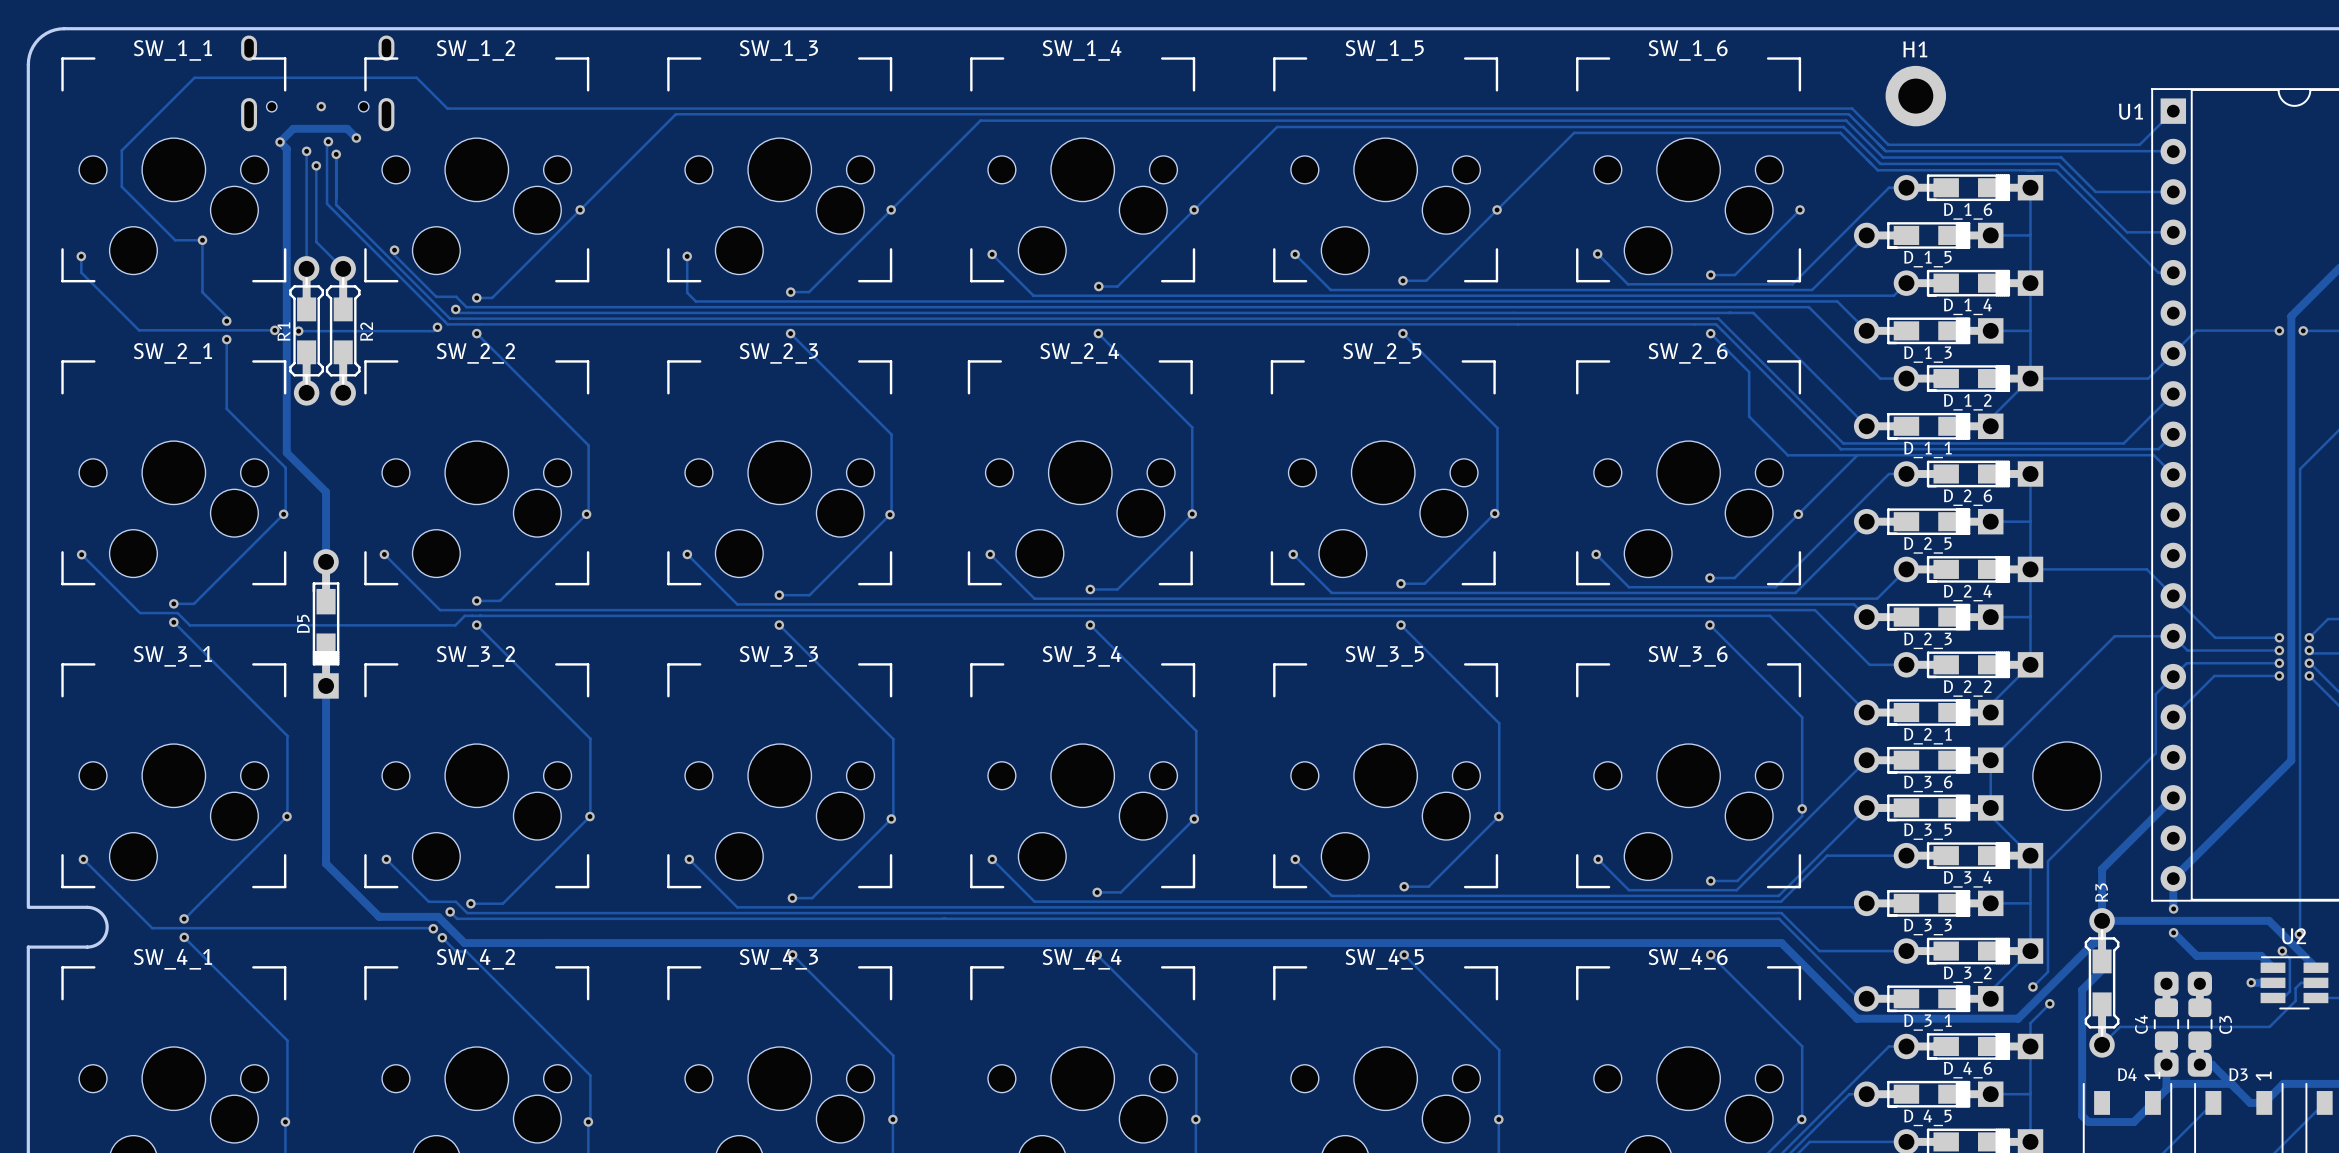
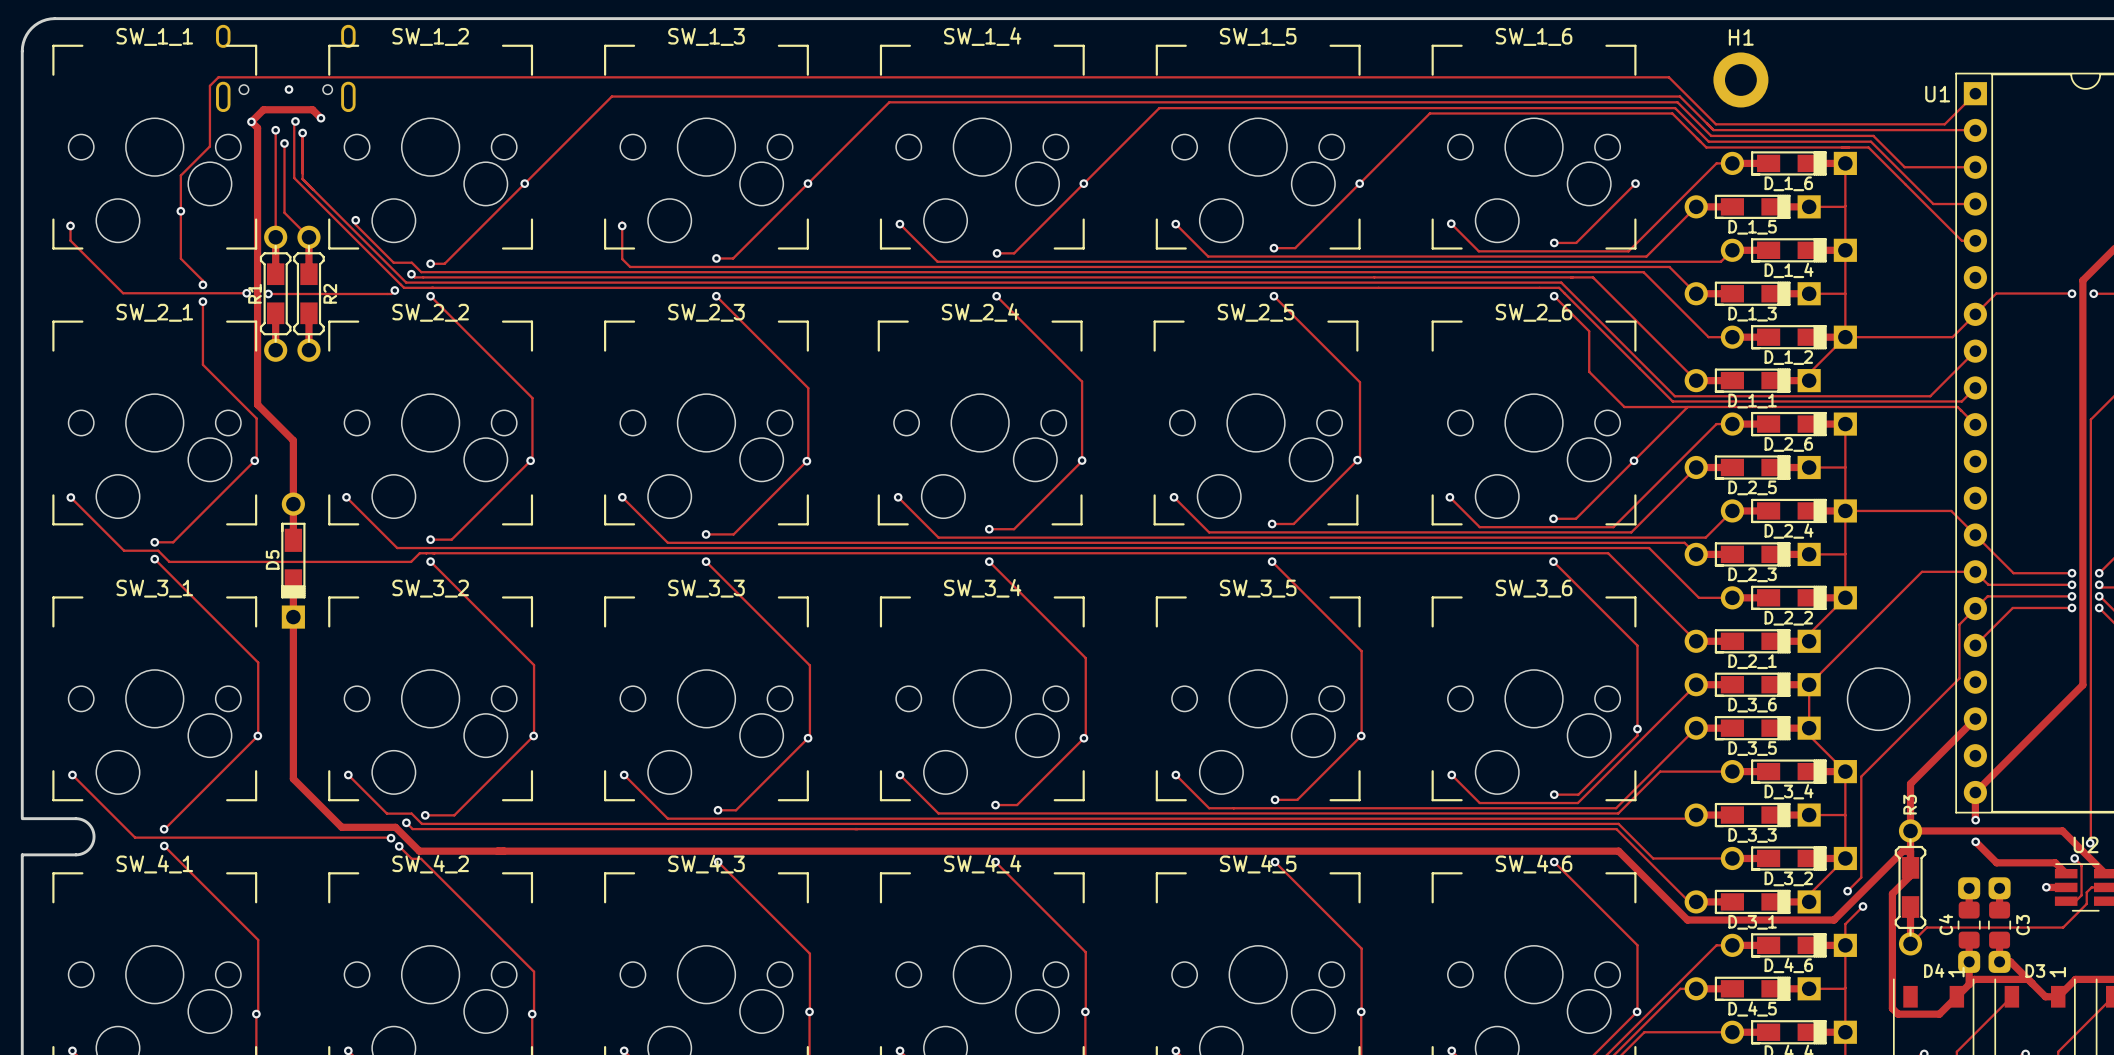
track: (1852, 108) (447, 108) (416, 77) (194, 77) (121, 150) (121, 186) (175, 240) (202, 240) -> (1682, 91) (1668, 77) (218, 77) (209, 85) (209, 146) (180, 175) (180, 211)

